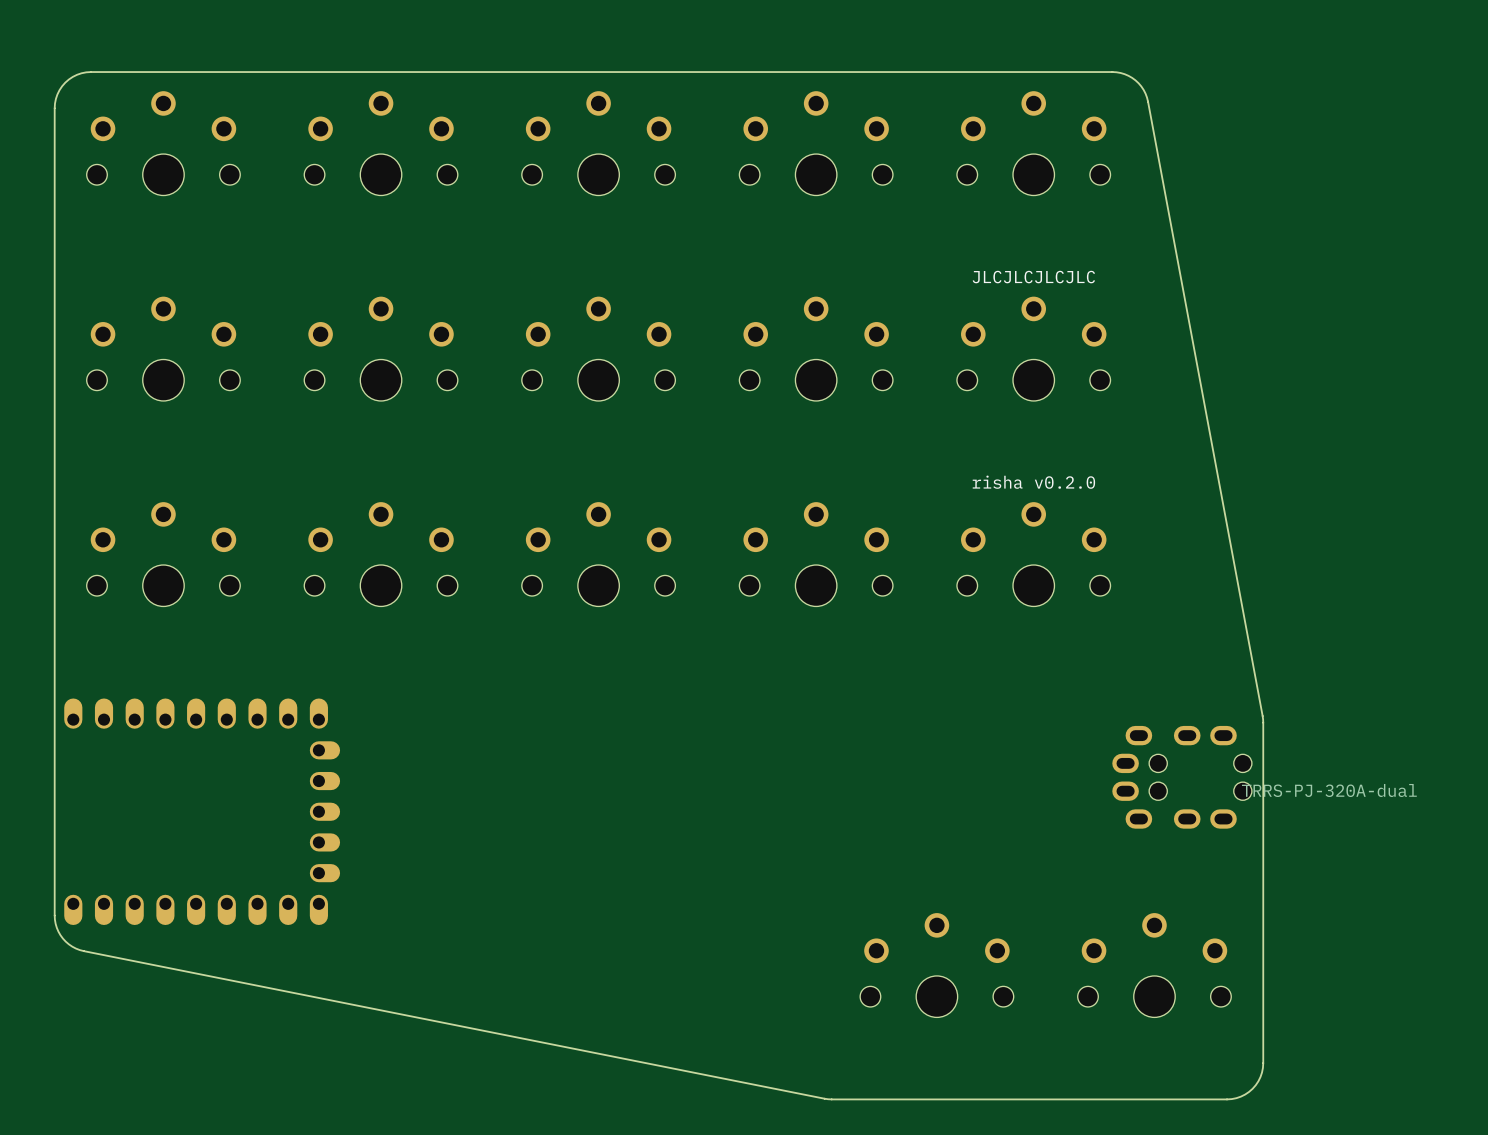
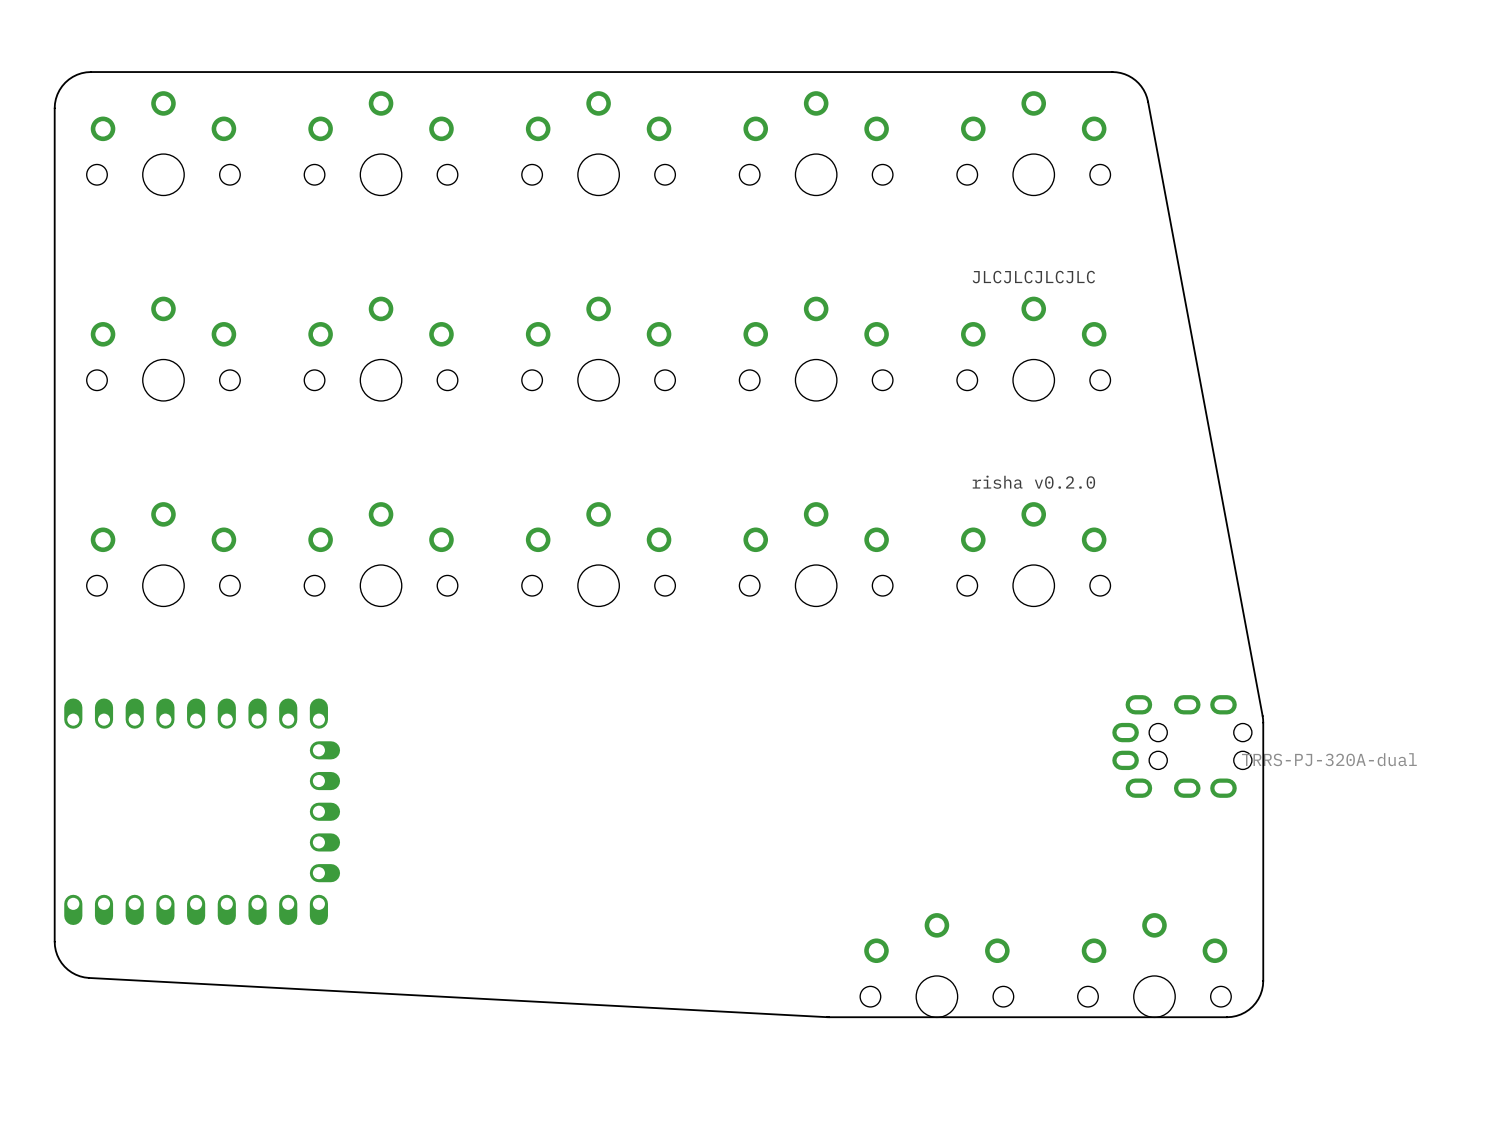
part position: (1182, 777) -> (1182, 746)
board edge: (54, 915) (56, 927) (62, 938) (72, 946) (83, 951) (828, 1099) (1236, 1098) (1252, 1088) (1262, 1072) (1263, 980) -> (54, 915) (54, 946) (59, 959) (71, 972) (89, 977) (829, 1017) (1231, 1016) (1245, 1012) (1255, 1003) (1260, 994) (1263, 980)

